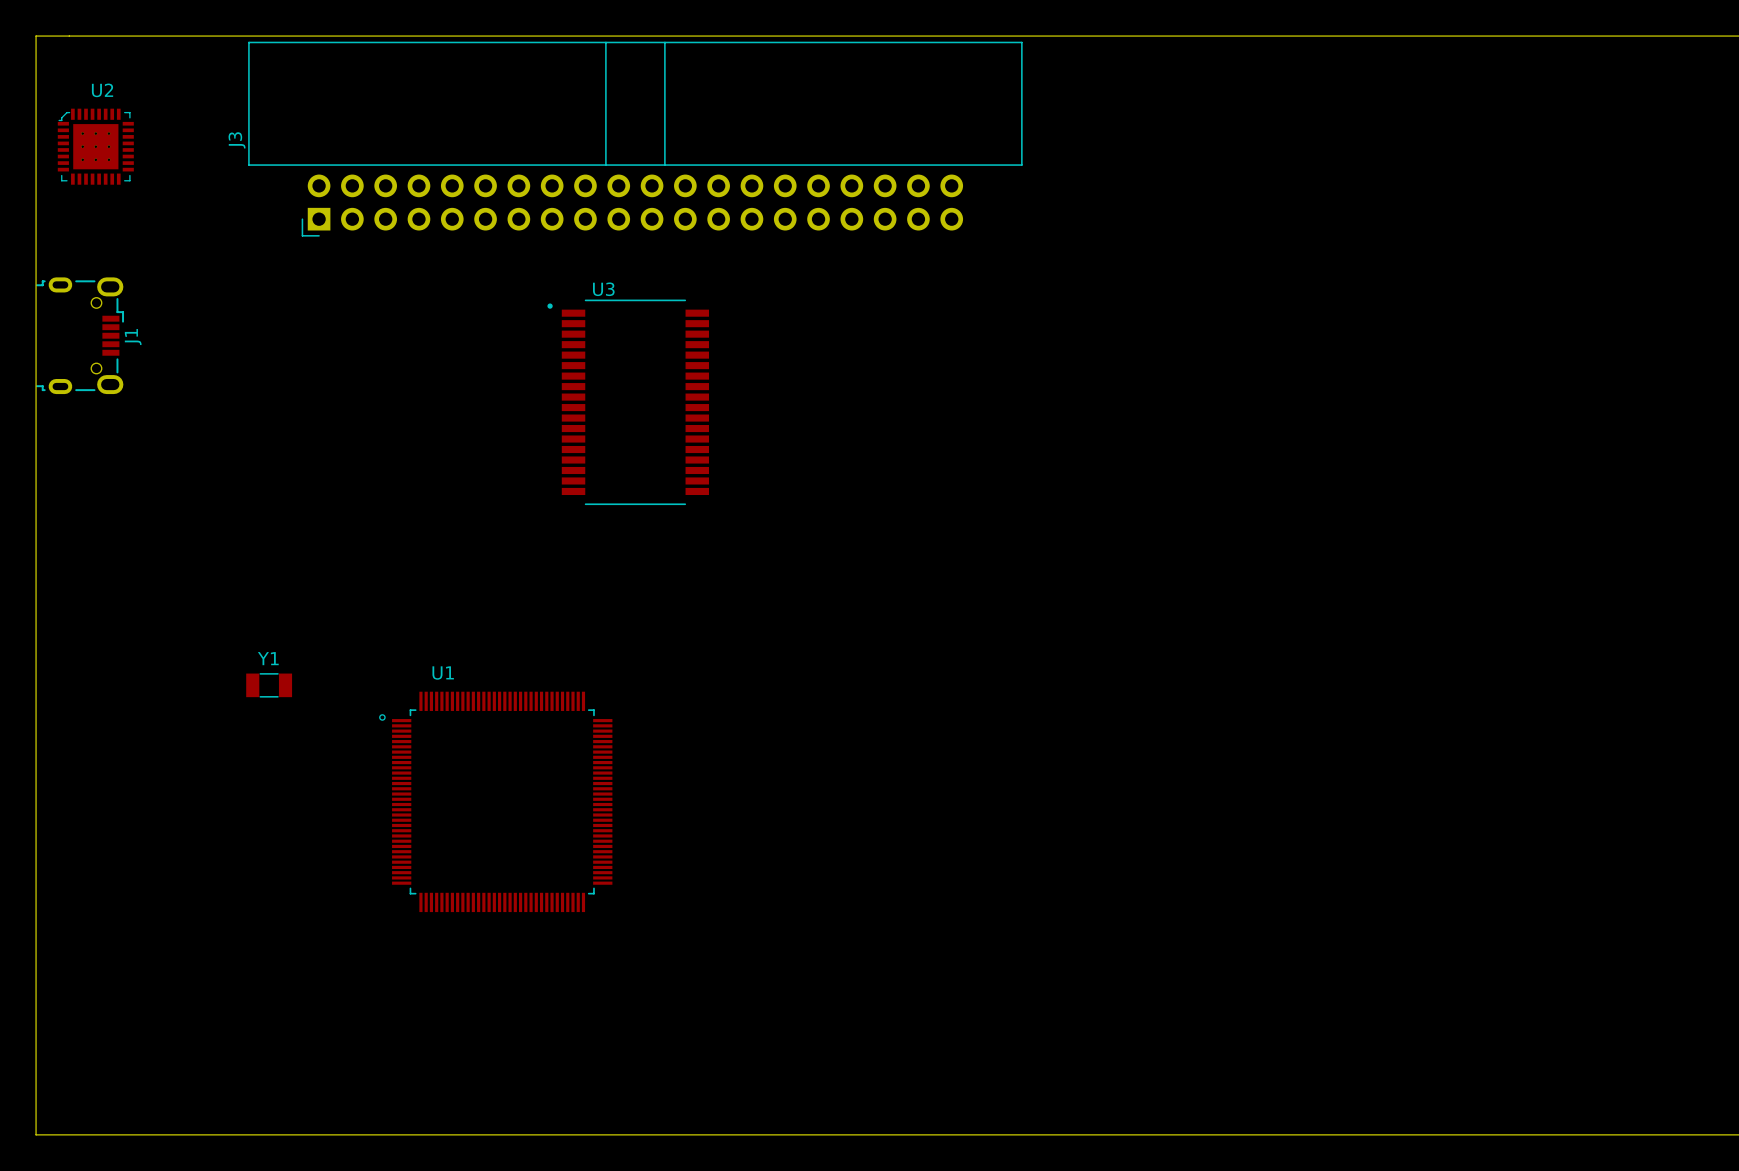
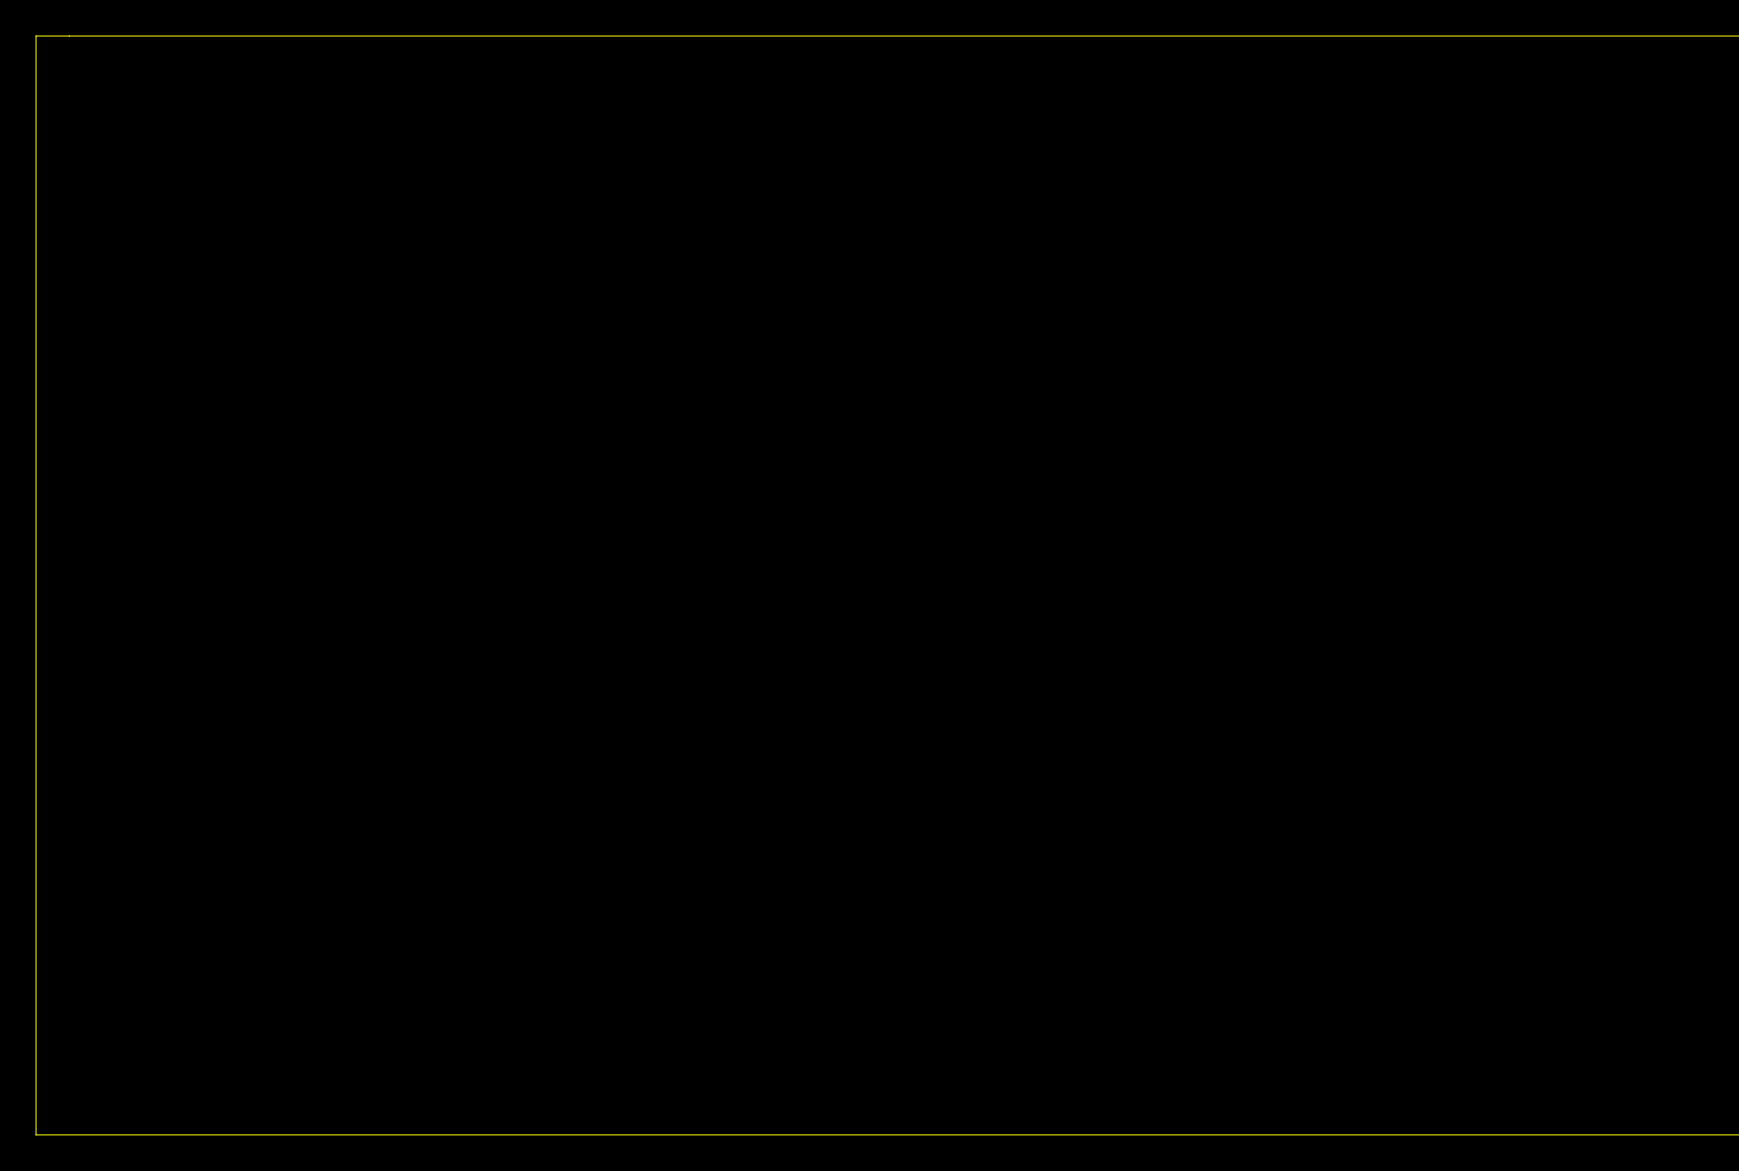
J3: (635, 139) -> none
U2: (95, 146) -> none
J1: (79, 335) -> none
U3: (628, 402) -> none
Y1: (269, 685) -> none
U1: (495, 801) -> none

